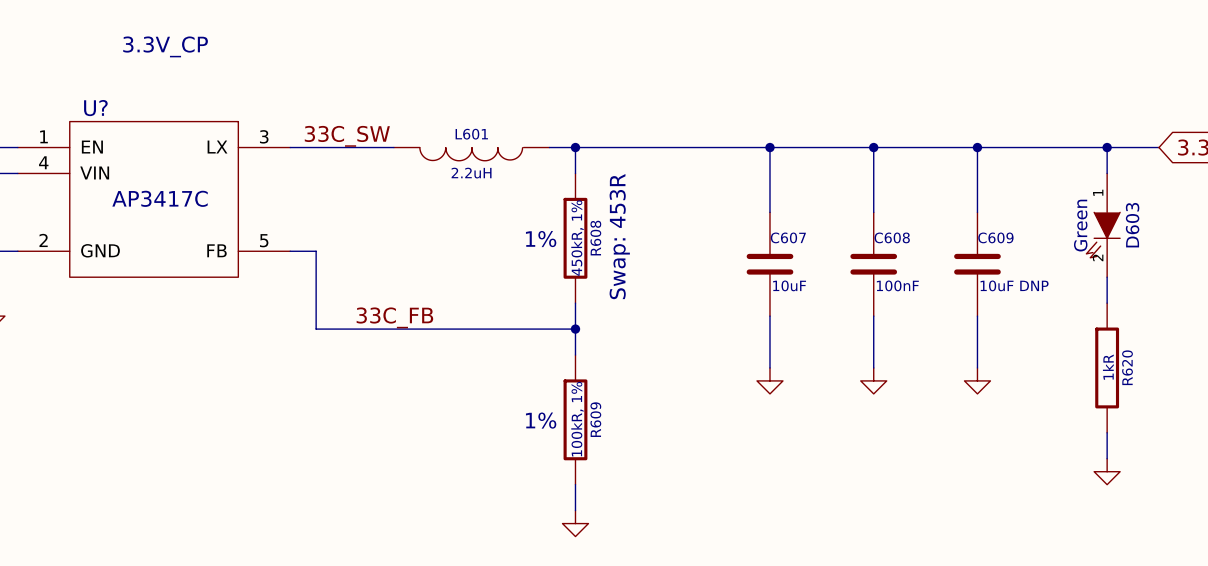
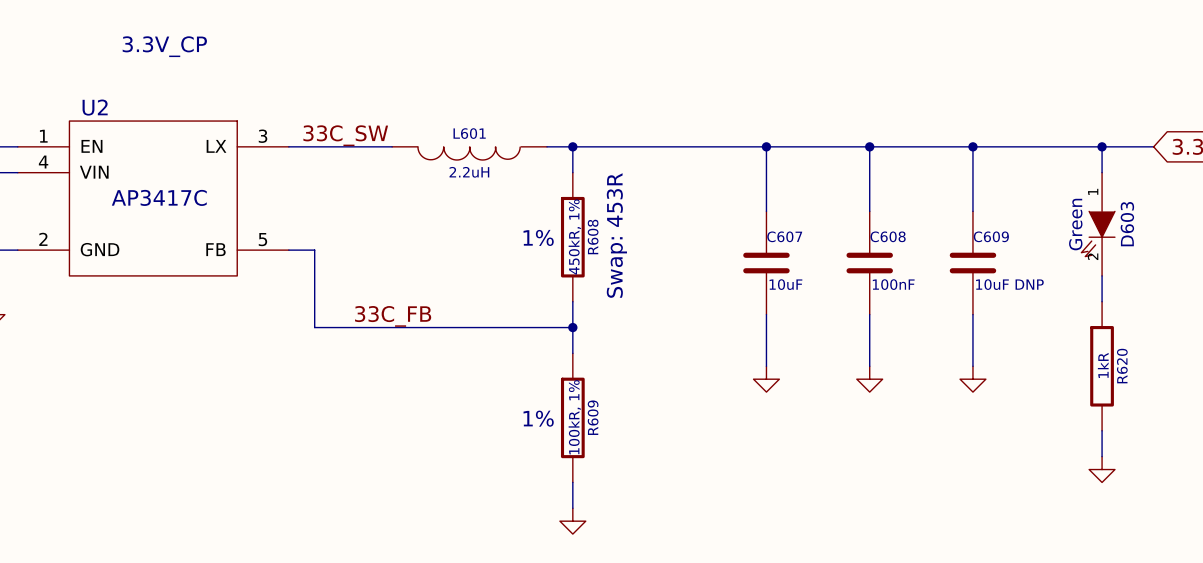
U? name: U? (95, 108) -> U2 (95, 107)

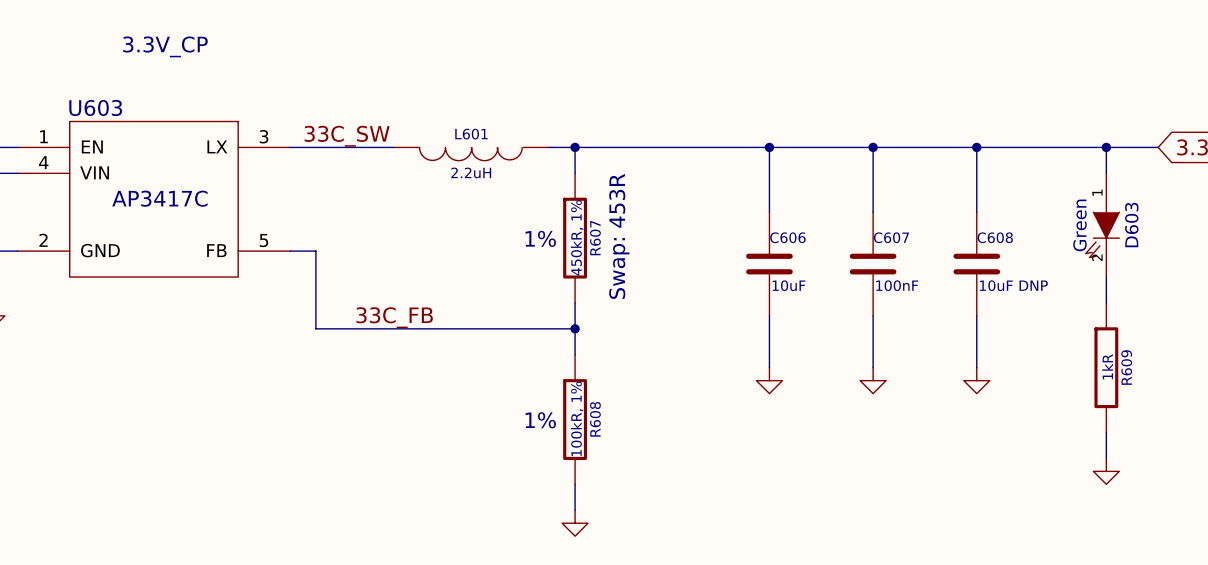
U2 name: U2 (95, 107) -> U603 (95, 107)
R608 name: R608 (593, 236) -> R607 (595, 238)
C607 name: C607 (784, 236) -> C606 (787, 237)
C608 name: C608 (888, 236) -> C607 (891, 237)
C609 name: C609 (991, 236) -> C608 (995, 237)
R620 name: R620 (1122, 366) -> R609 (1126, 367)
R609 name: R609 (593, 417) -> R608 (595, 419)

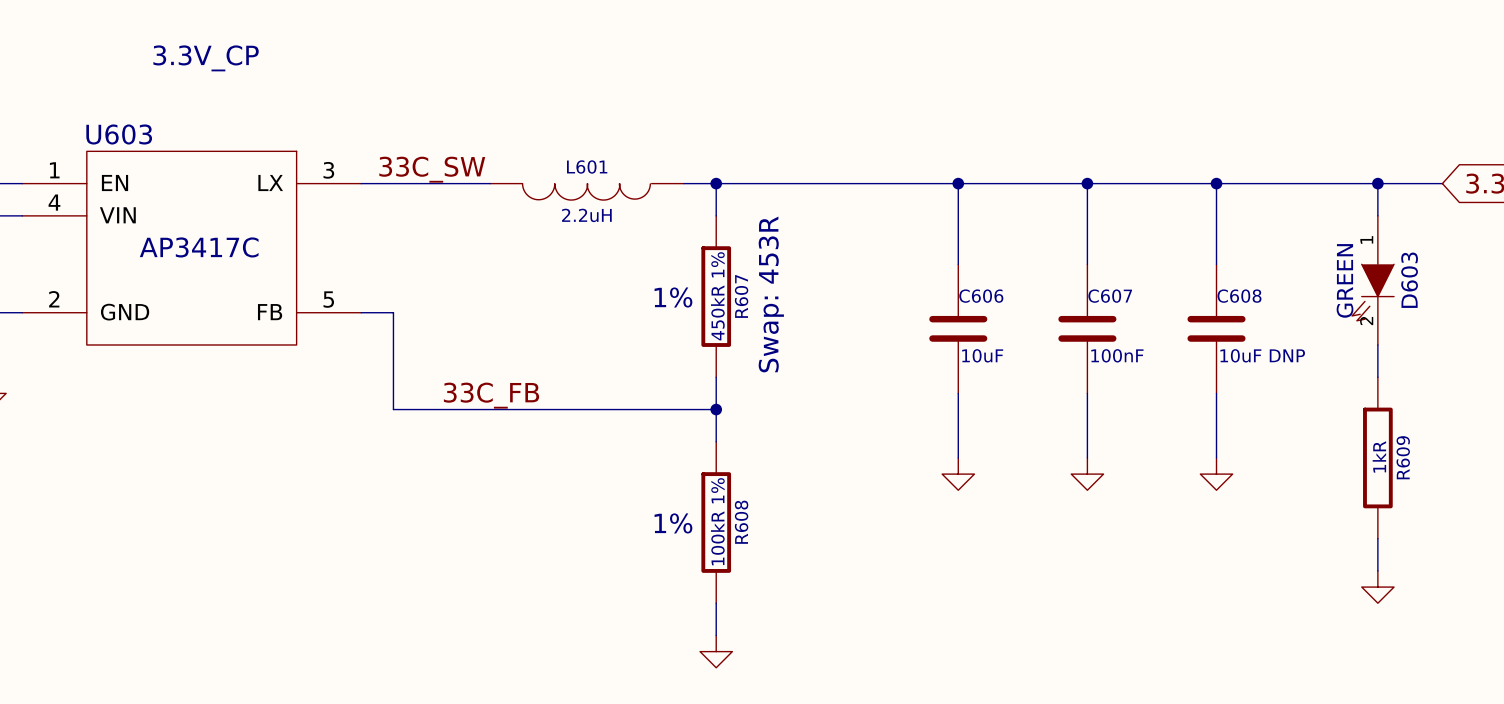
D603 value: Green (1079, 225) -> GREEN (1345, 280)
R607 value: 450kR, 1% (577, 237) -> 450kR 1% (717, 296)
R608 value: 100kR, 1% (577, 418) -> 100kR 1% (717, 521)

